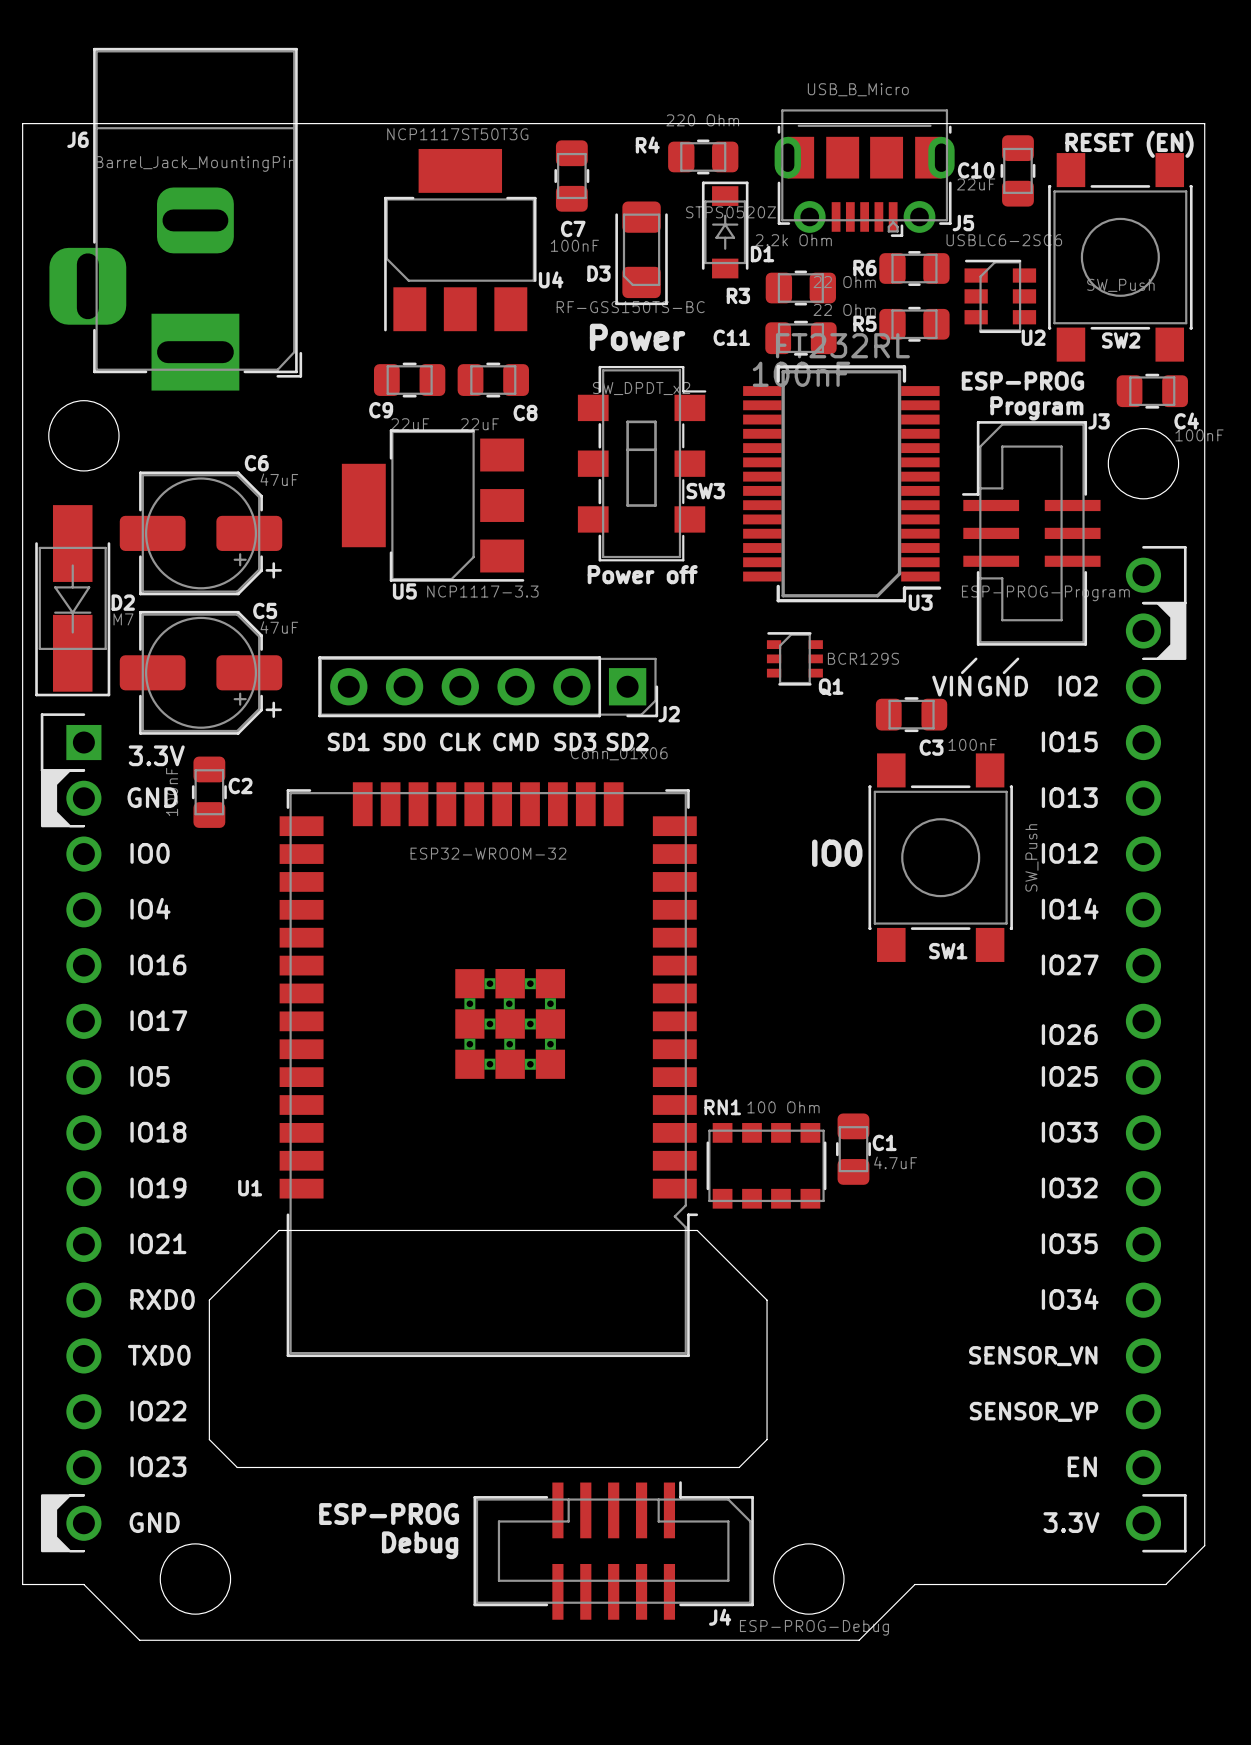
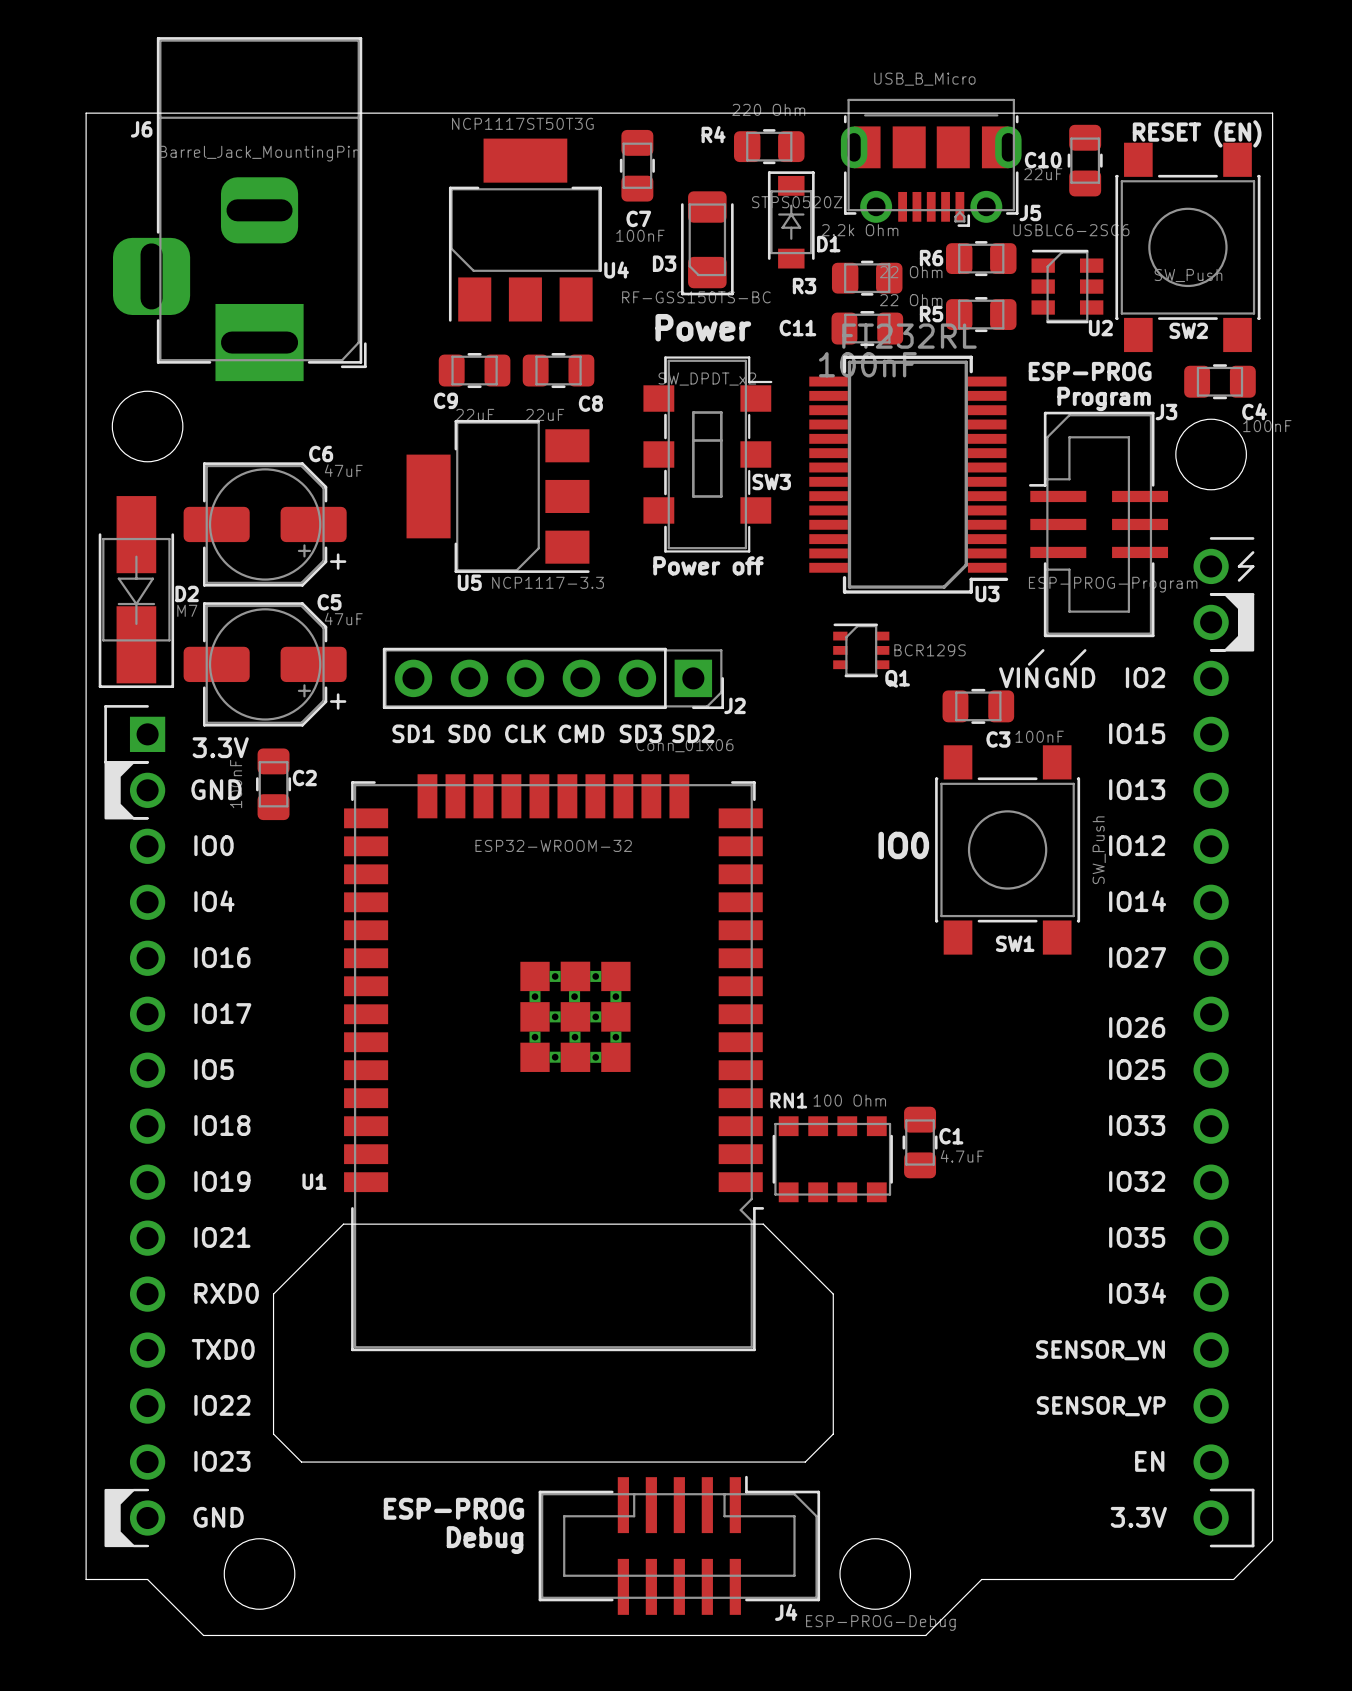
line: (1185, 547) (1185, 603) -> none
line: none -> (1253, 552) (1239, 566) (1253, 566) (1239, 580)

